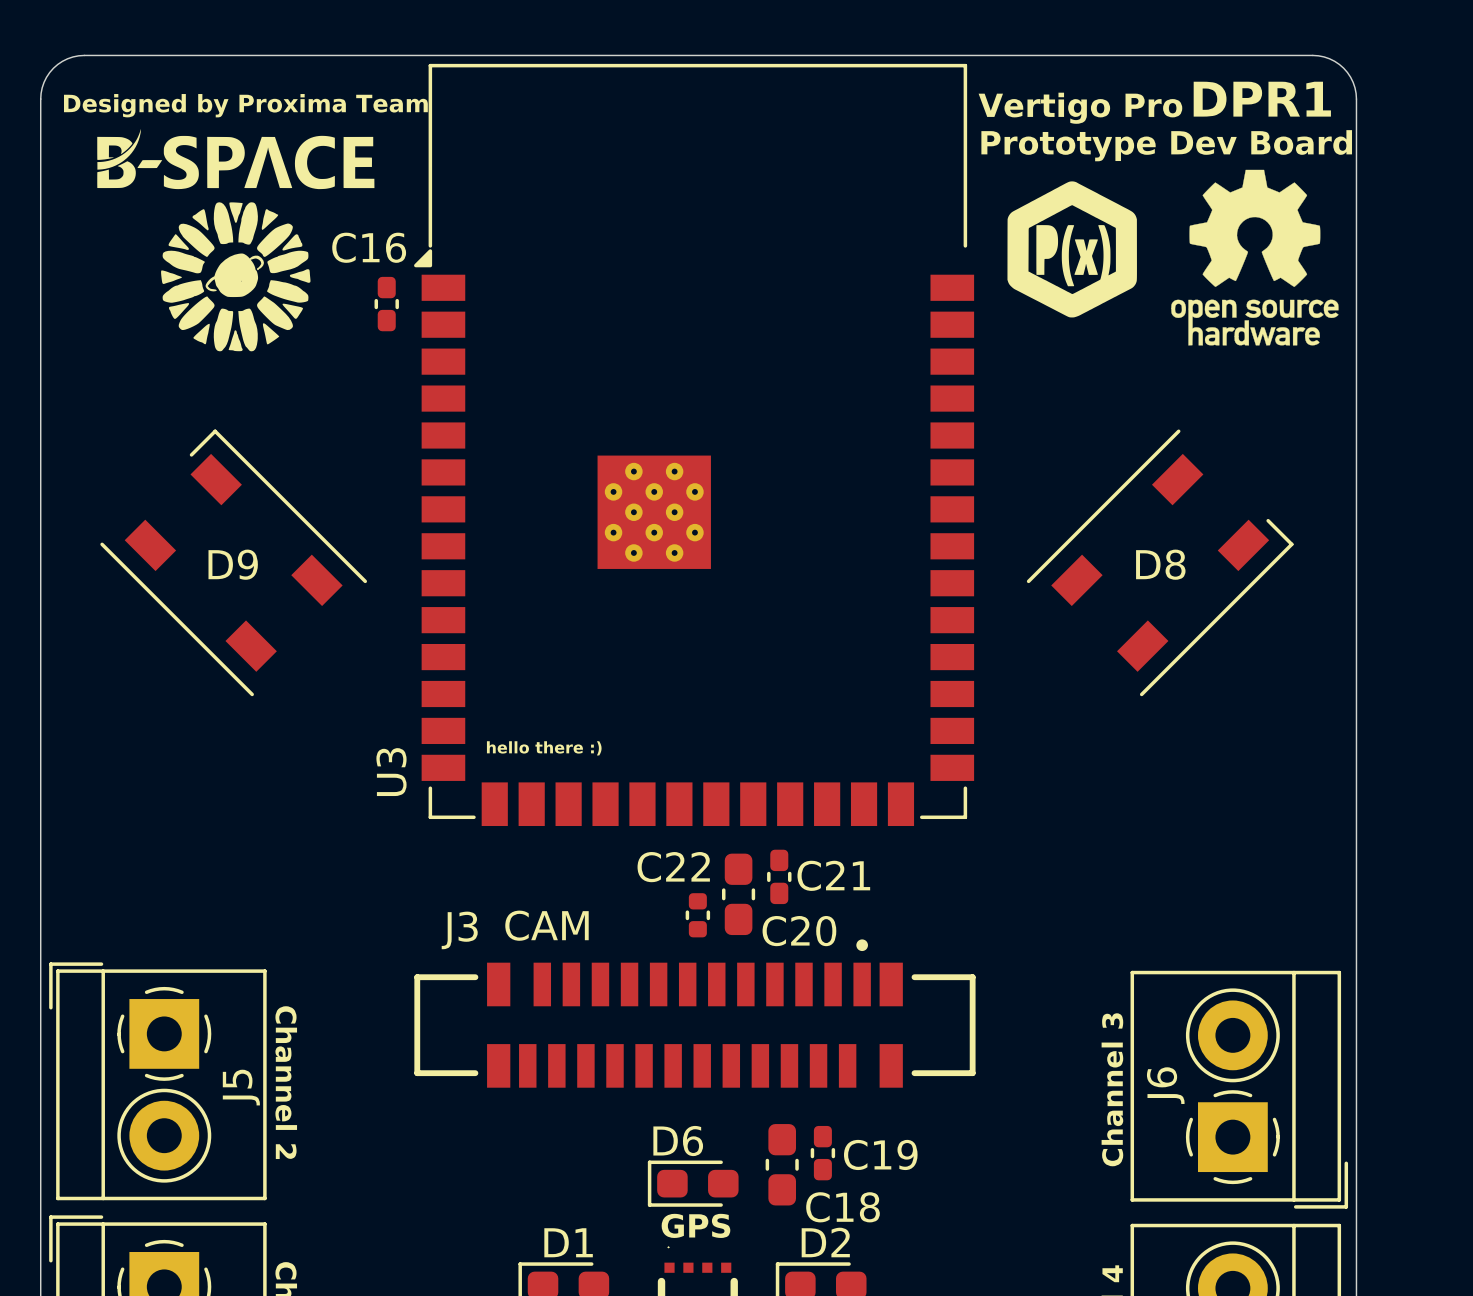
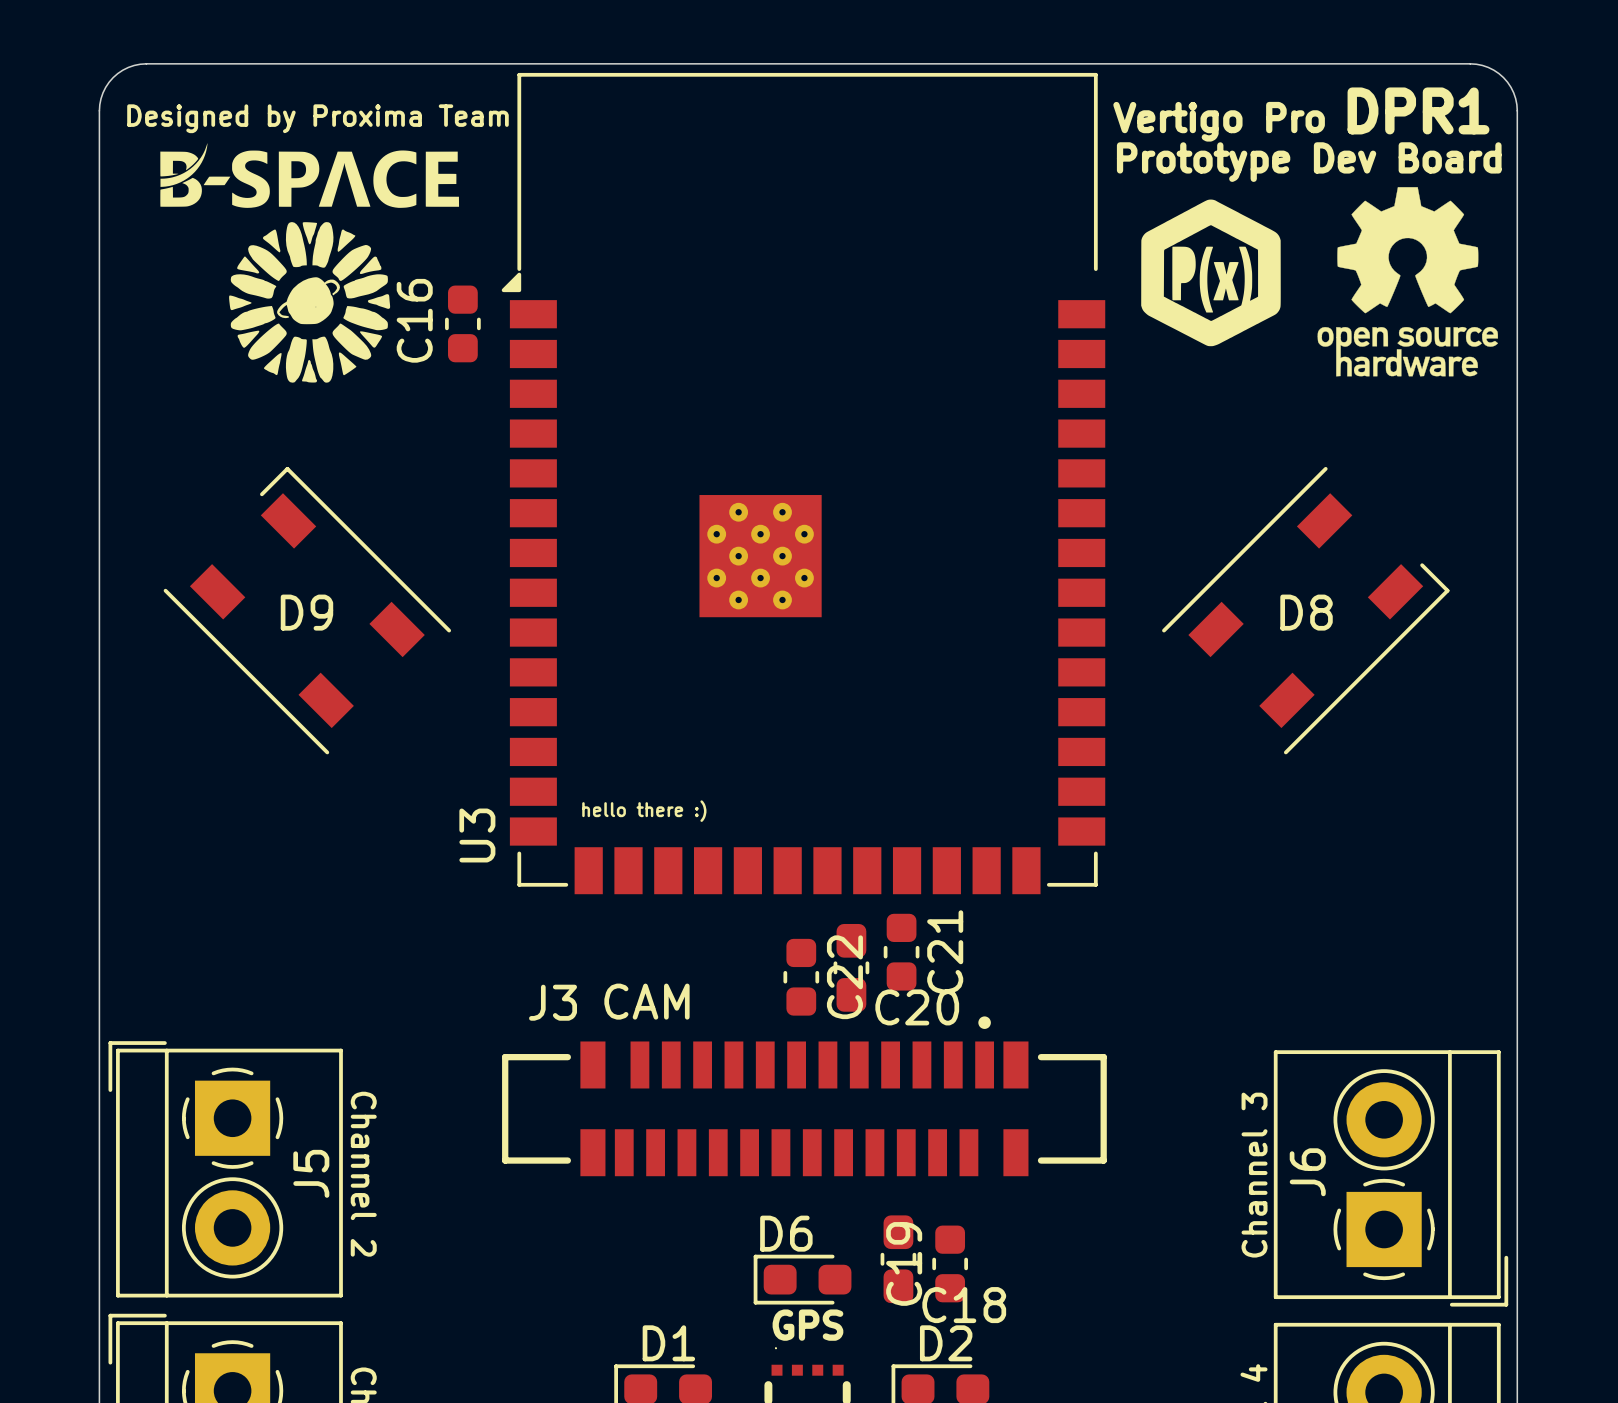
C16 name rotation: 0° (369, 247) -> 90° counterclockwise (414, 320)
C16 footprint: [374, 276, 399, 332] -> [445, 285, 481, 363]
C21 footprint: [767, 849, 792, 905] -> [883, 913, 920, 991]
C22 name rotation: 0° (673, 867) -> 90° counterclockwise (844, 977)
C21 name rotation: 0° (833, 875) -> 90° counterclockwise (945, 952)
C22 footprint: [685, 893, 711, 938] -> [783, 938, 820, 1016]
C19 footprint: [810, 1125, 836, 1181] -> [932, 1225, 969, 1303]
C19 name rotation: 0° (880, 1154) -> 90° counterclockwise (904, 1263)

